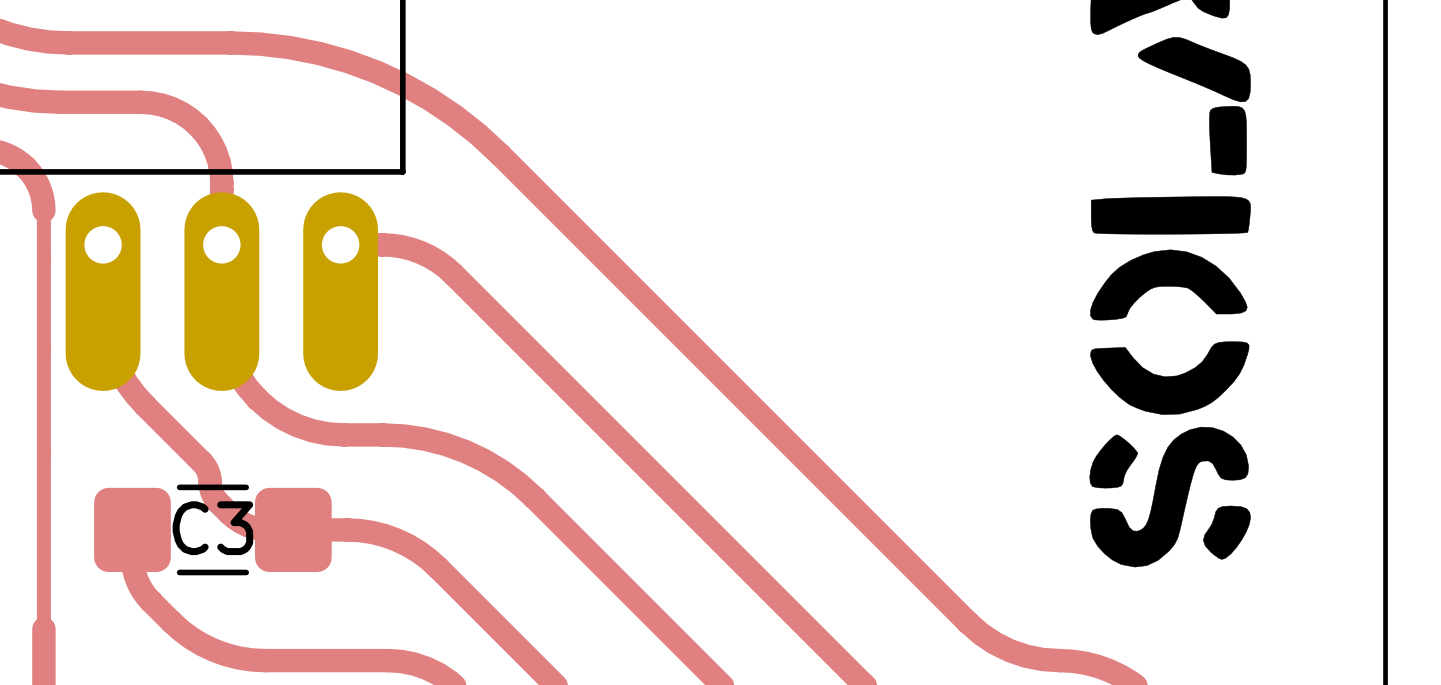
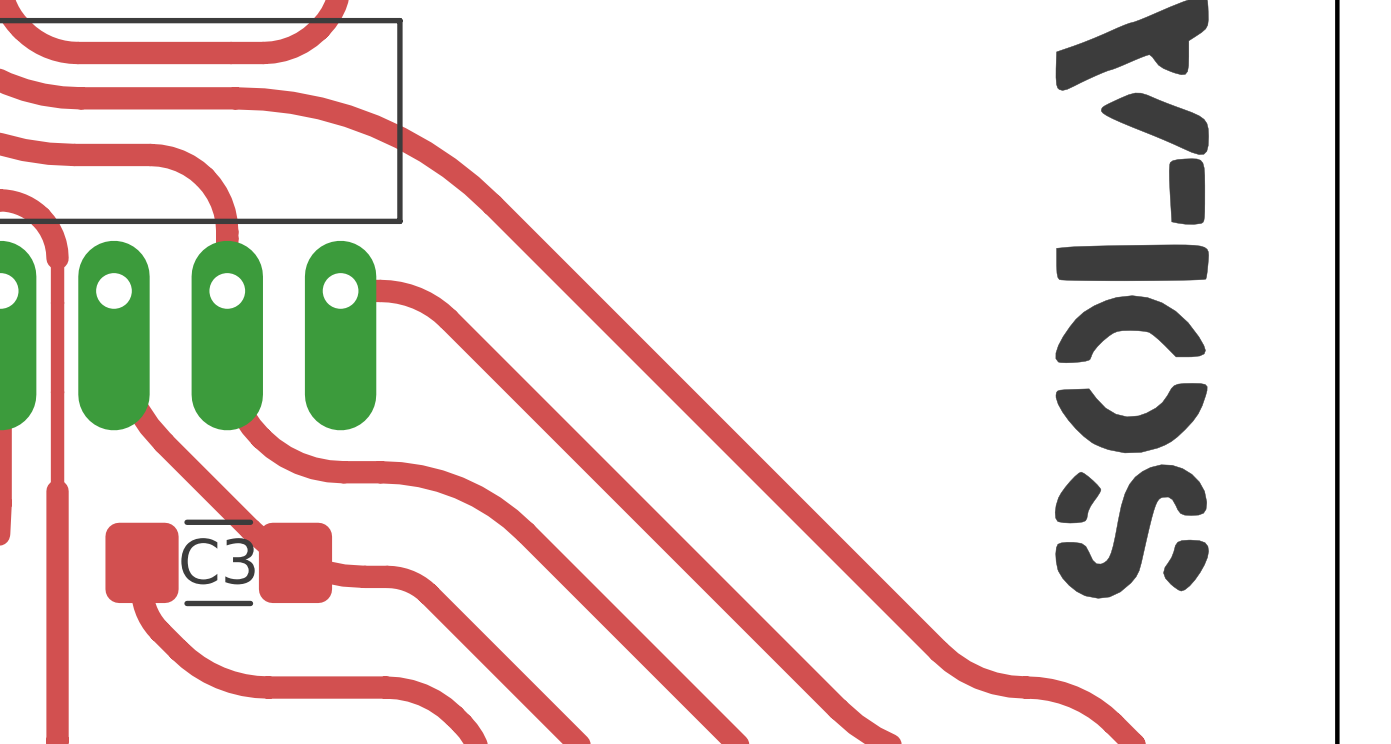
track: (103, 304) (109, 345) (127, 383) (144, 405) (204, 464) (209, 475) (213, 495) (234, 518) (247, 525) (262, 529) (346, 529) (371, 532) (407, 545) (438, 567) -> (113, 321) (119, 366) (136, 407) (149, 426) (266, 543) (303, 564) (323, 571) (343, 575) (392, 577) (404, 579) (419, 586) (433, 598)
track width: thin (43, 454) (43, 628) -> thick (57, 491) (57, 657)

